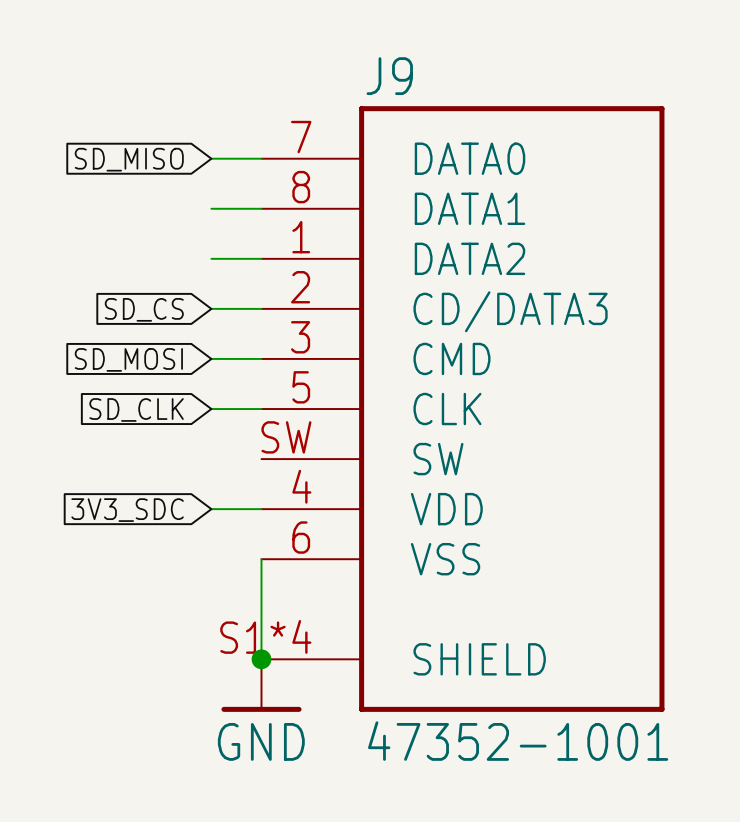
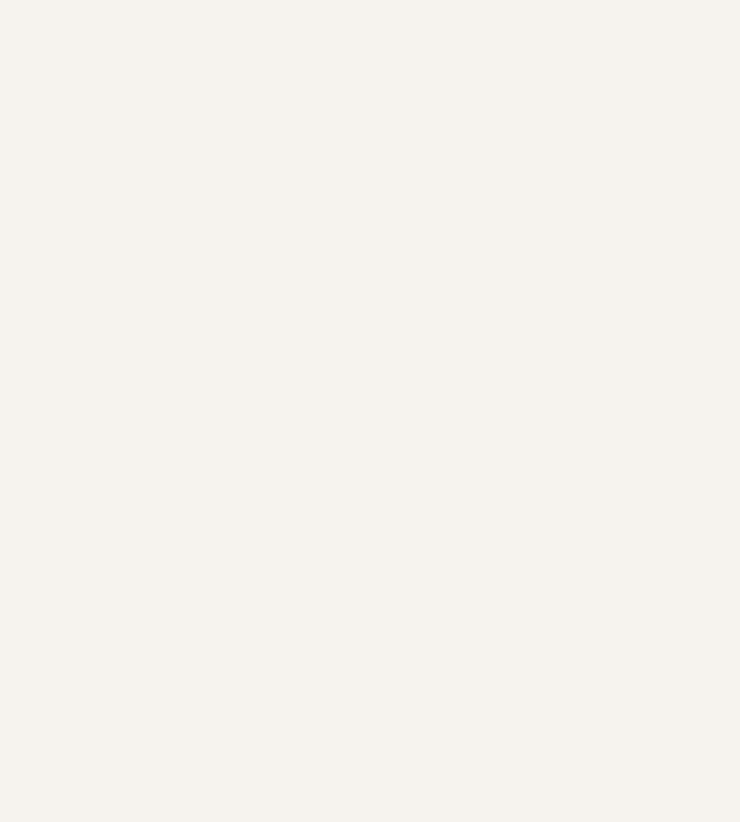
wire: (211, 158) (261, 158) -> none
global label: SD_MISO (129, 159) -> none
wire: (211, 208) (261, 208) -> none
wire: (211, 258) (261, 258) -> none
wire: (211, 308) (261, 308) -> none
global label: SD_CS (144, 309) -> none
wire: (211, 358) (261, 358) -> none
global label: SD_MOSI (128, 359) -> none
global label: SD_CLK (136, 409) -> none
wire: (211, 409) (261, 409) -> none
J9: 47352-1001 (462, 409) -> none
wire: (211, 509) (261, 509) -> none
global label: 3V3_SDC (127, 510) -> none
wire: (261, 559) (261, 659) -> none
junction: (261, 659) -> none
power symbol: GND (261, 685) -> none

